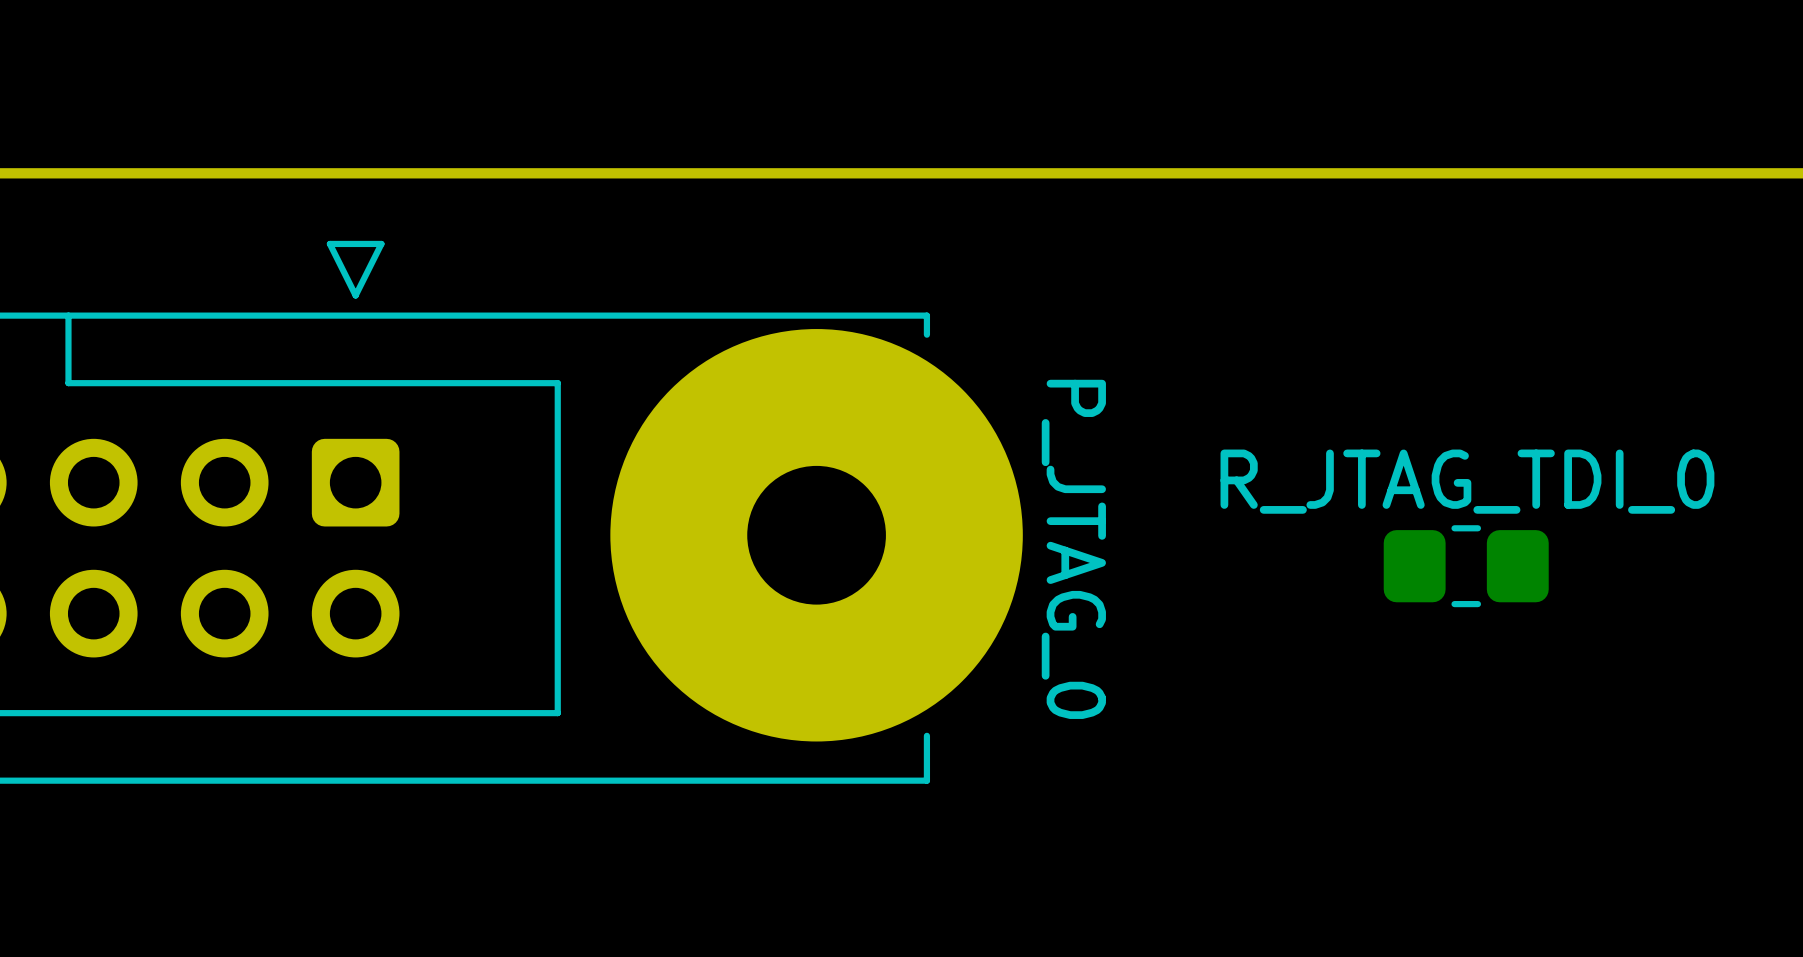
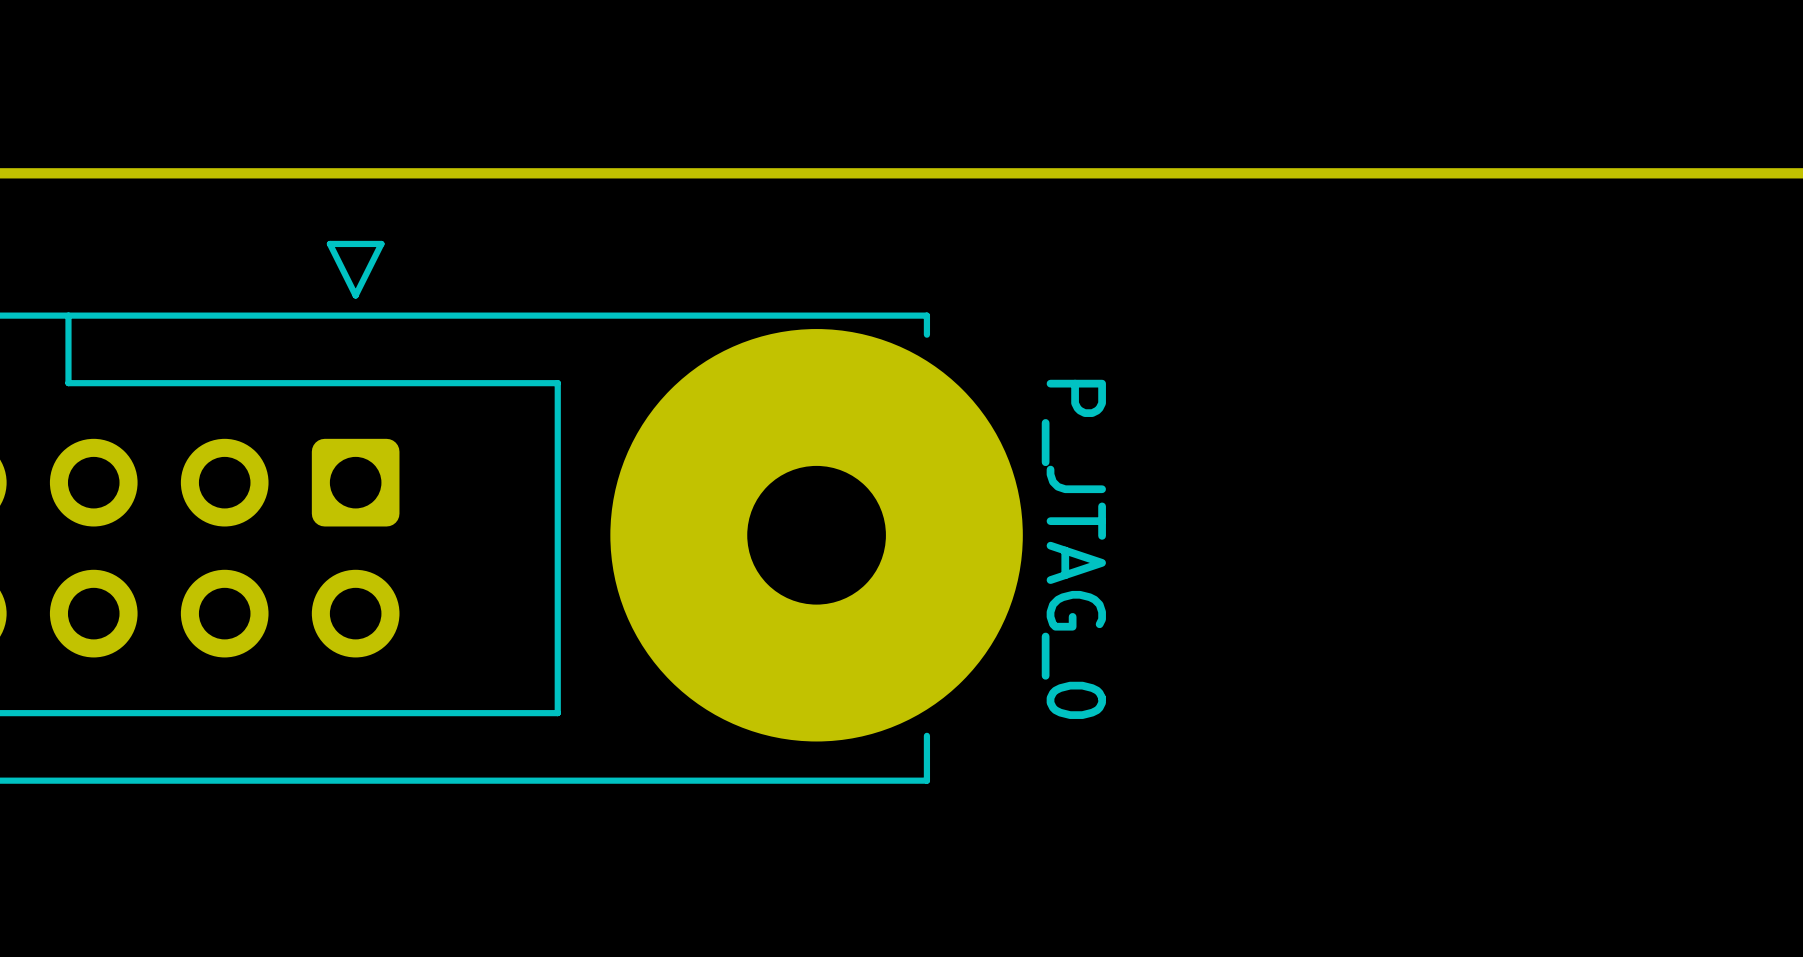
R_JTAG_TDI_0: (1466, 566) -> none

